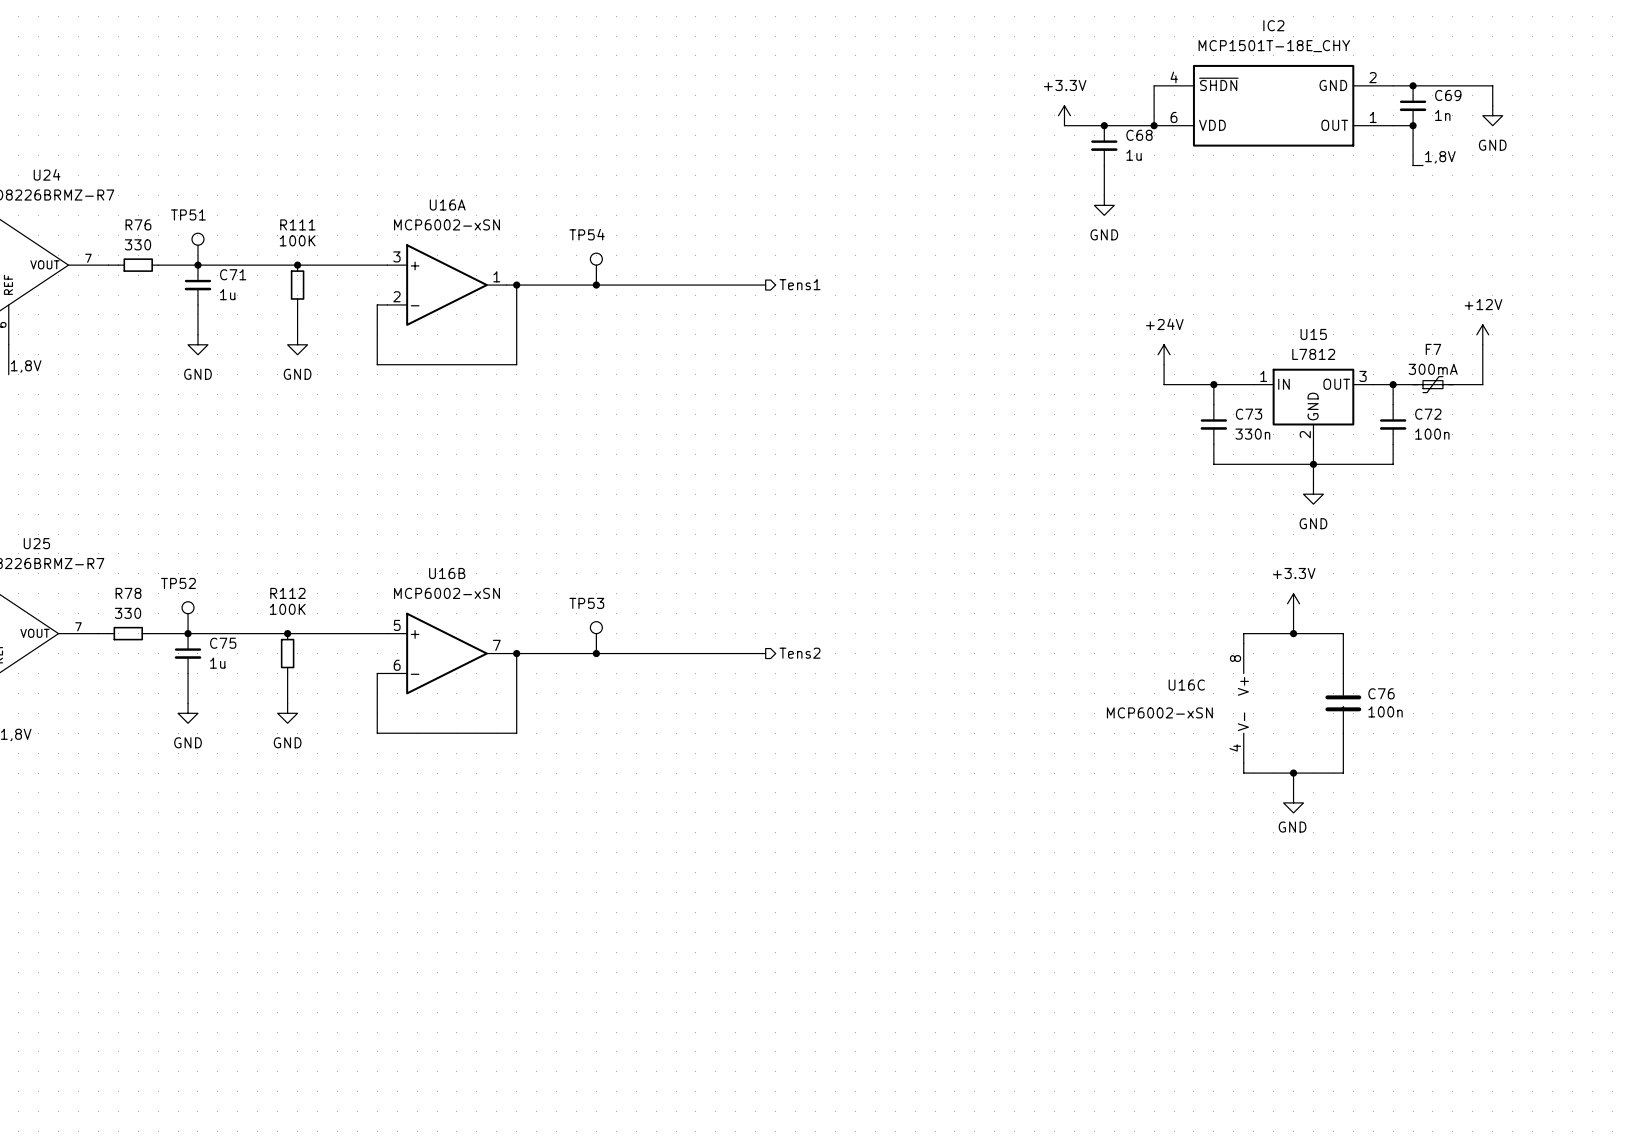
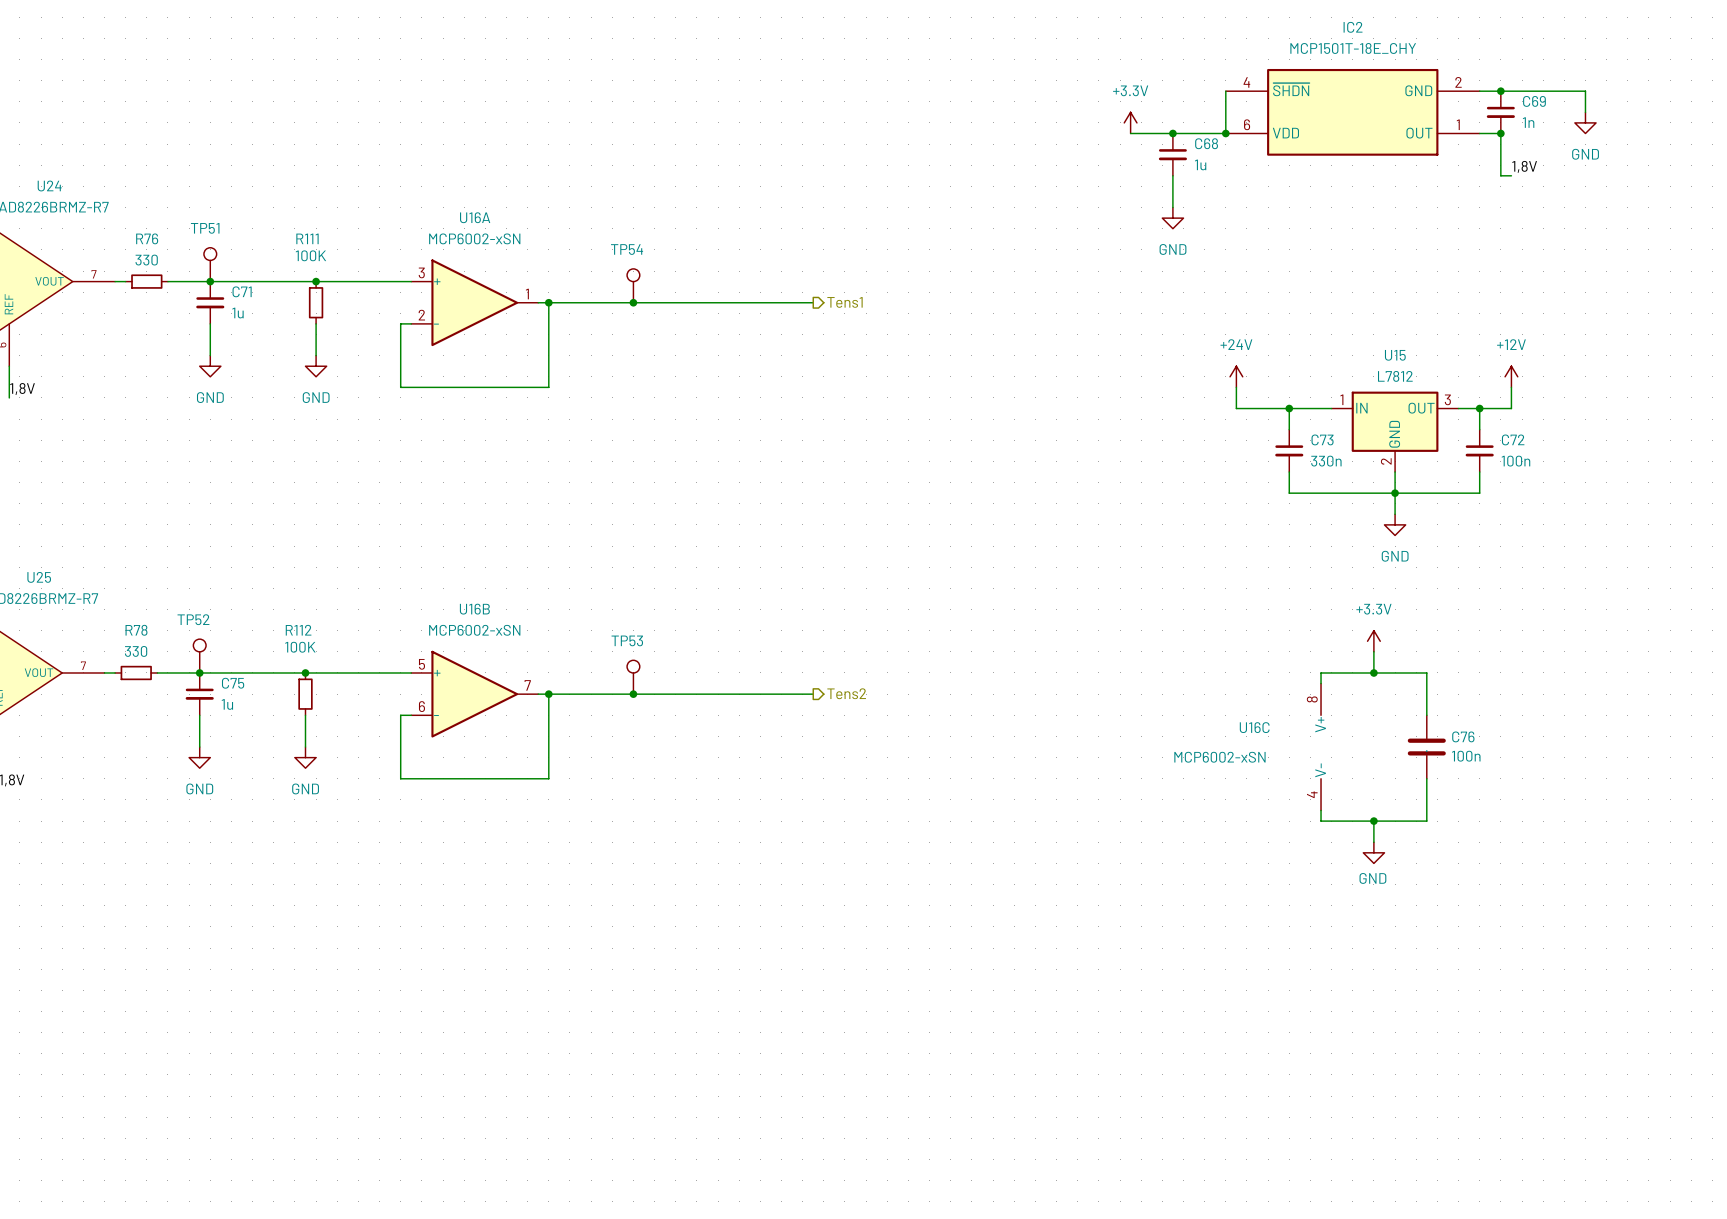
power symbol position: +12V (1482, 334) -> +12V (1511, 376)
wire: (1482, 344) (1482, 384) (1452, 384) -> none
wire: none -> (1511, 387) (1511, 408) (1500, 408)
F7: 300mA (1432, 384) -> none

